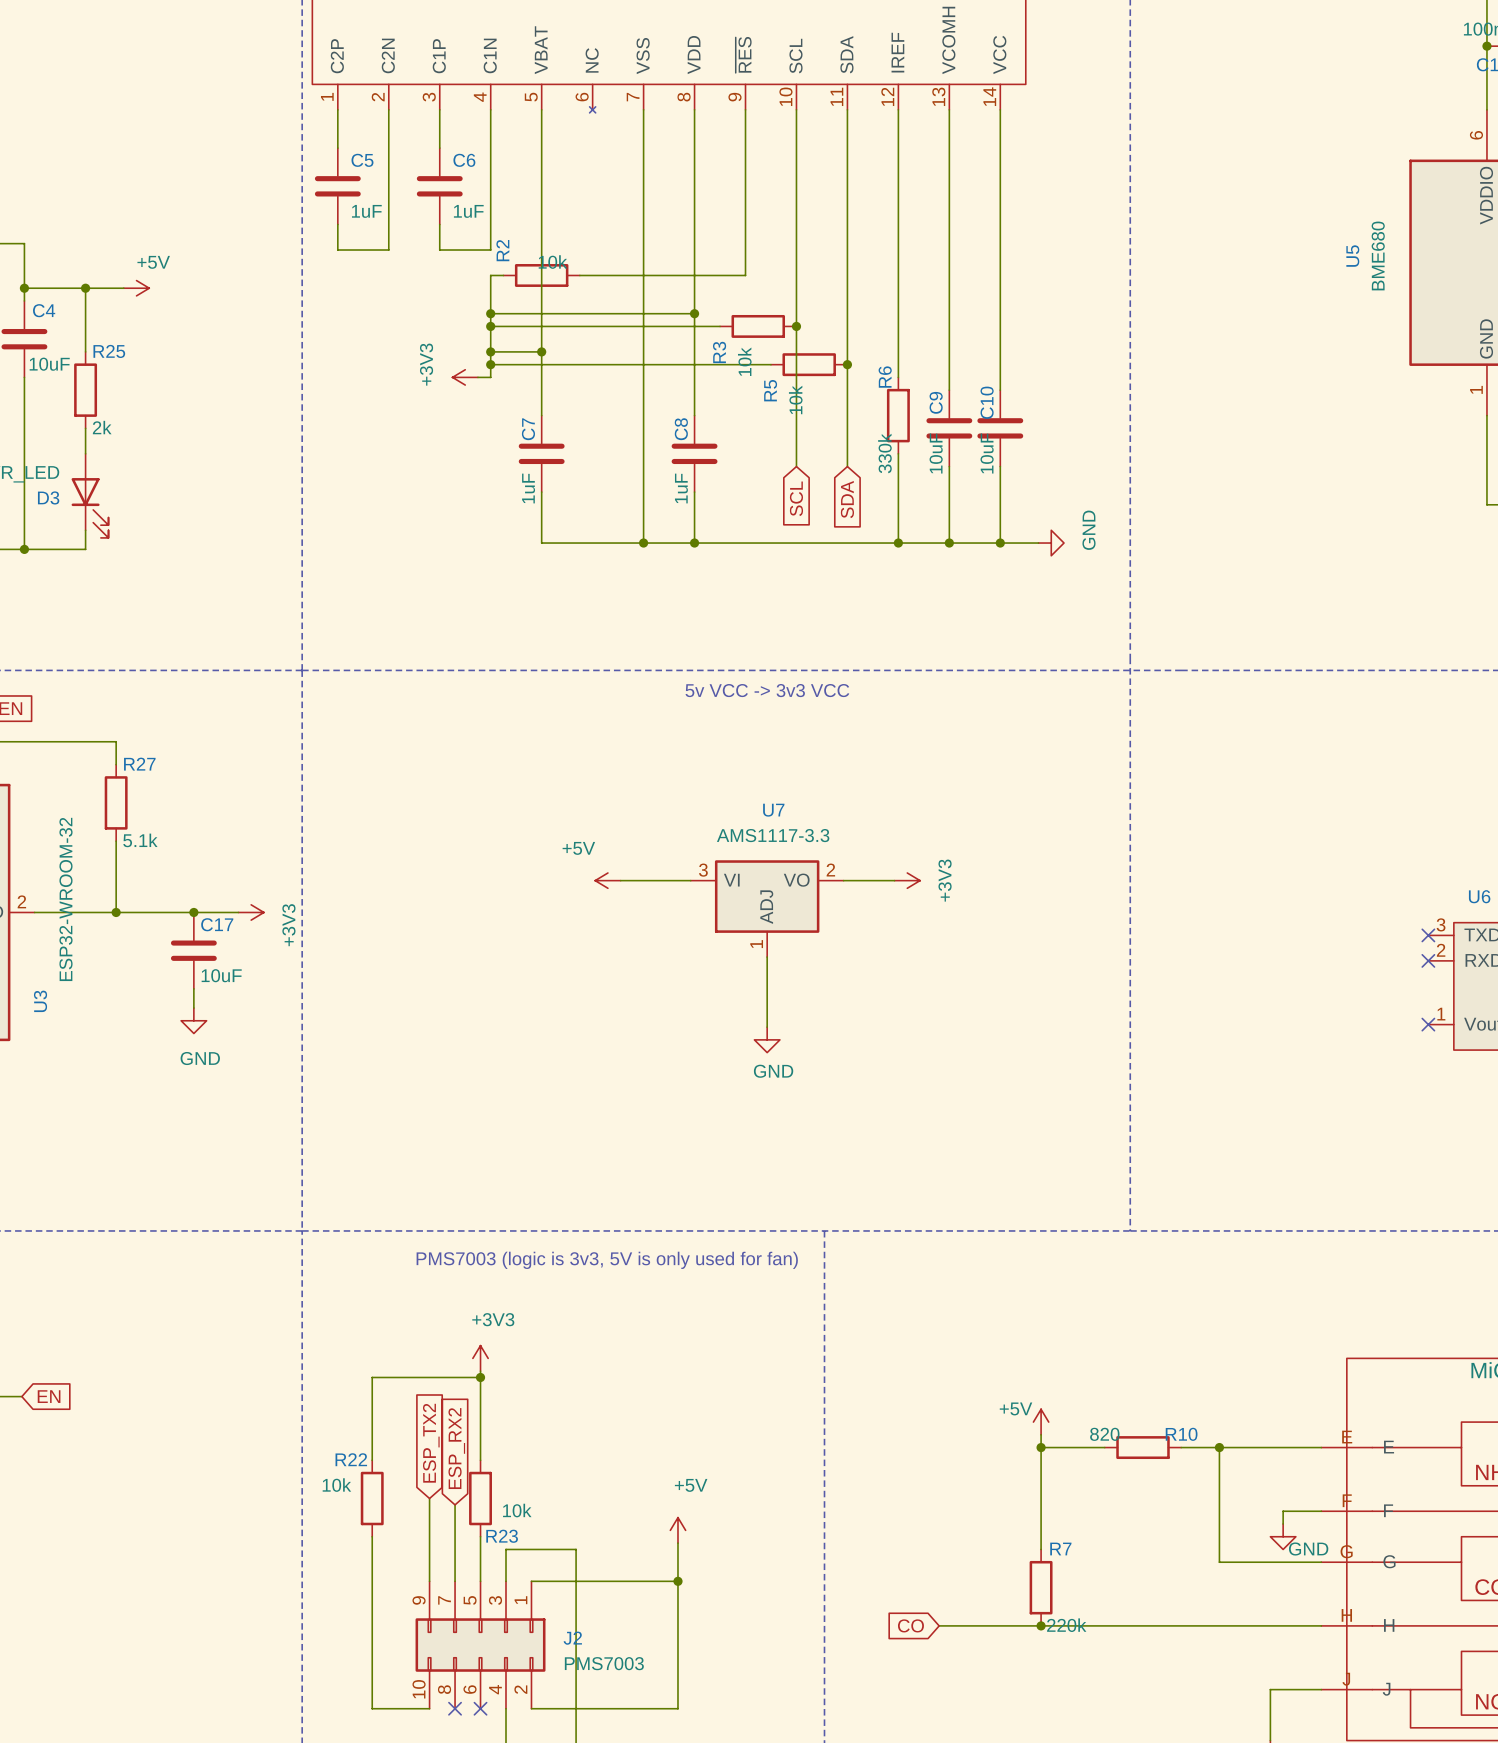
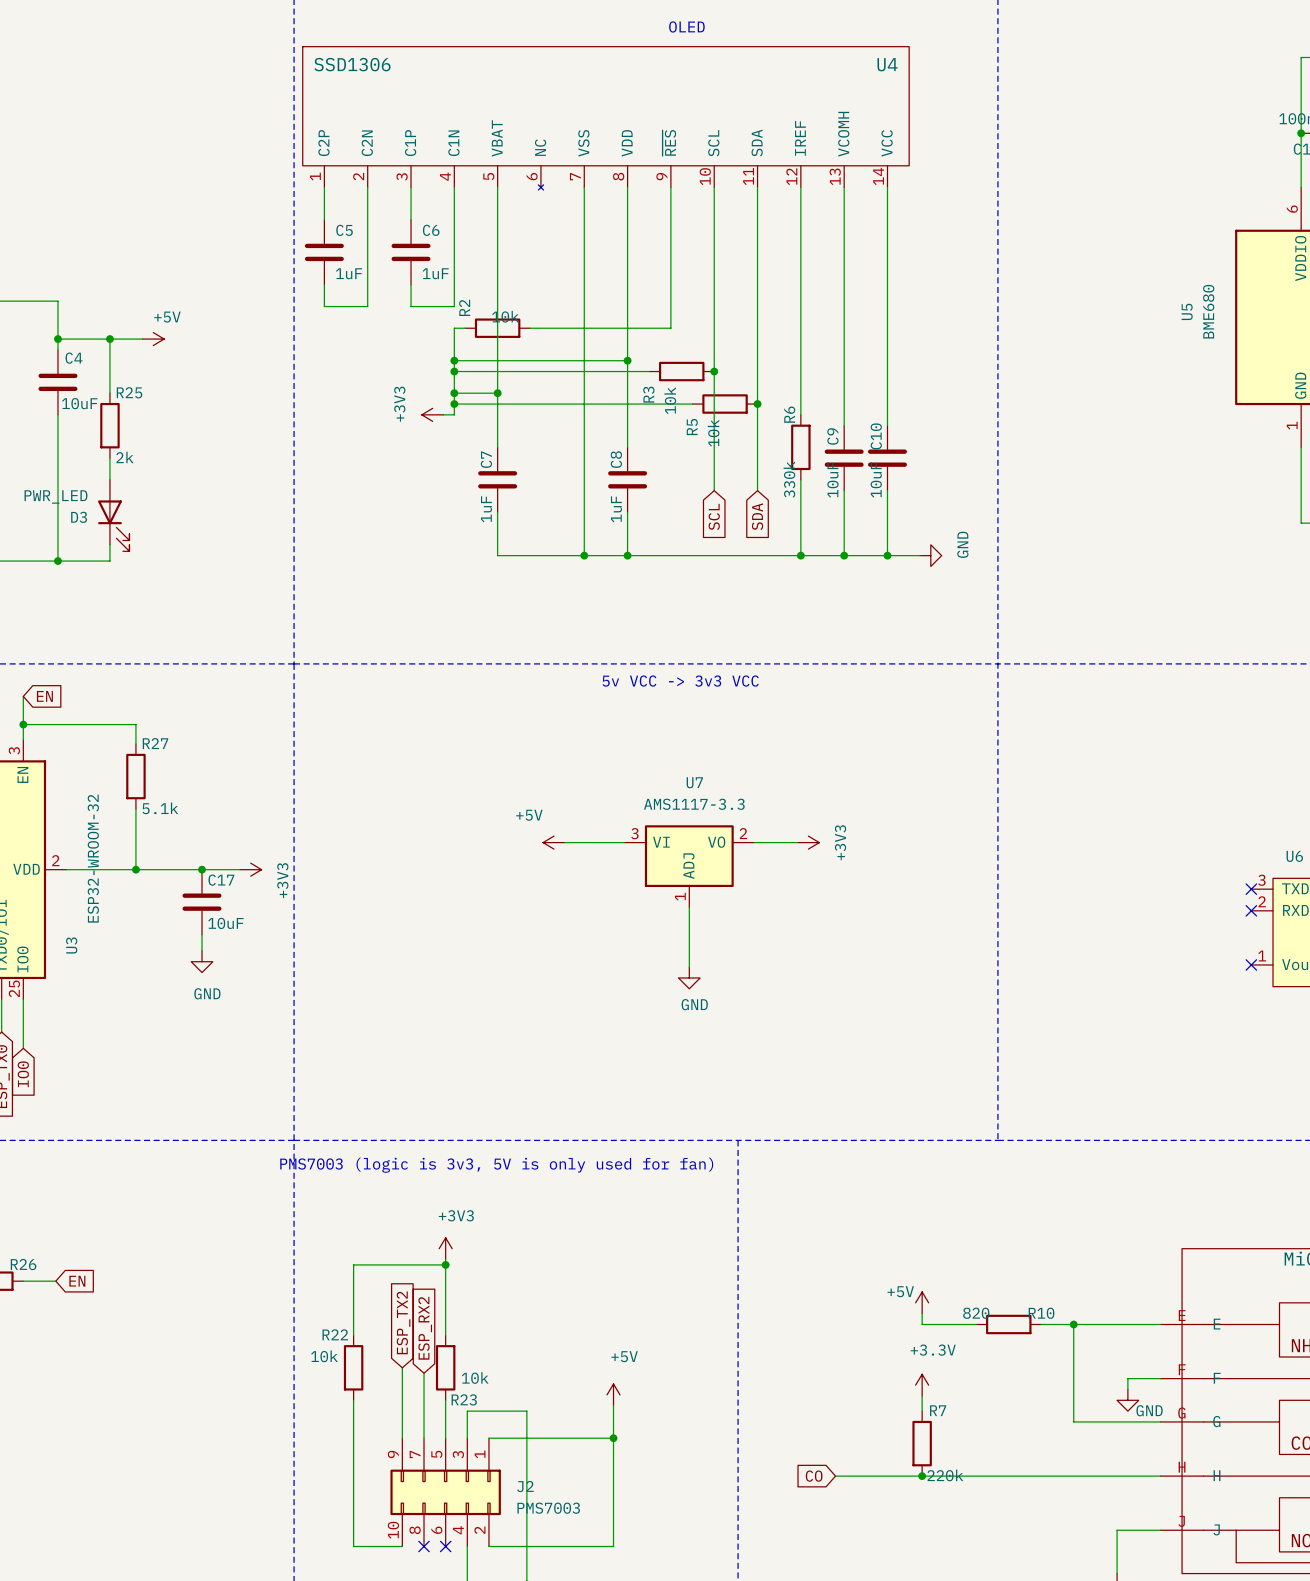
wire: (1041, 1447) (1041, 1531) -> none
junction: (1041, 1447) -> none
power symbol: none -> +3.3V (922, 1385)

